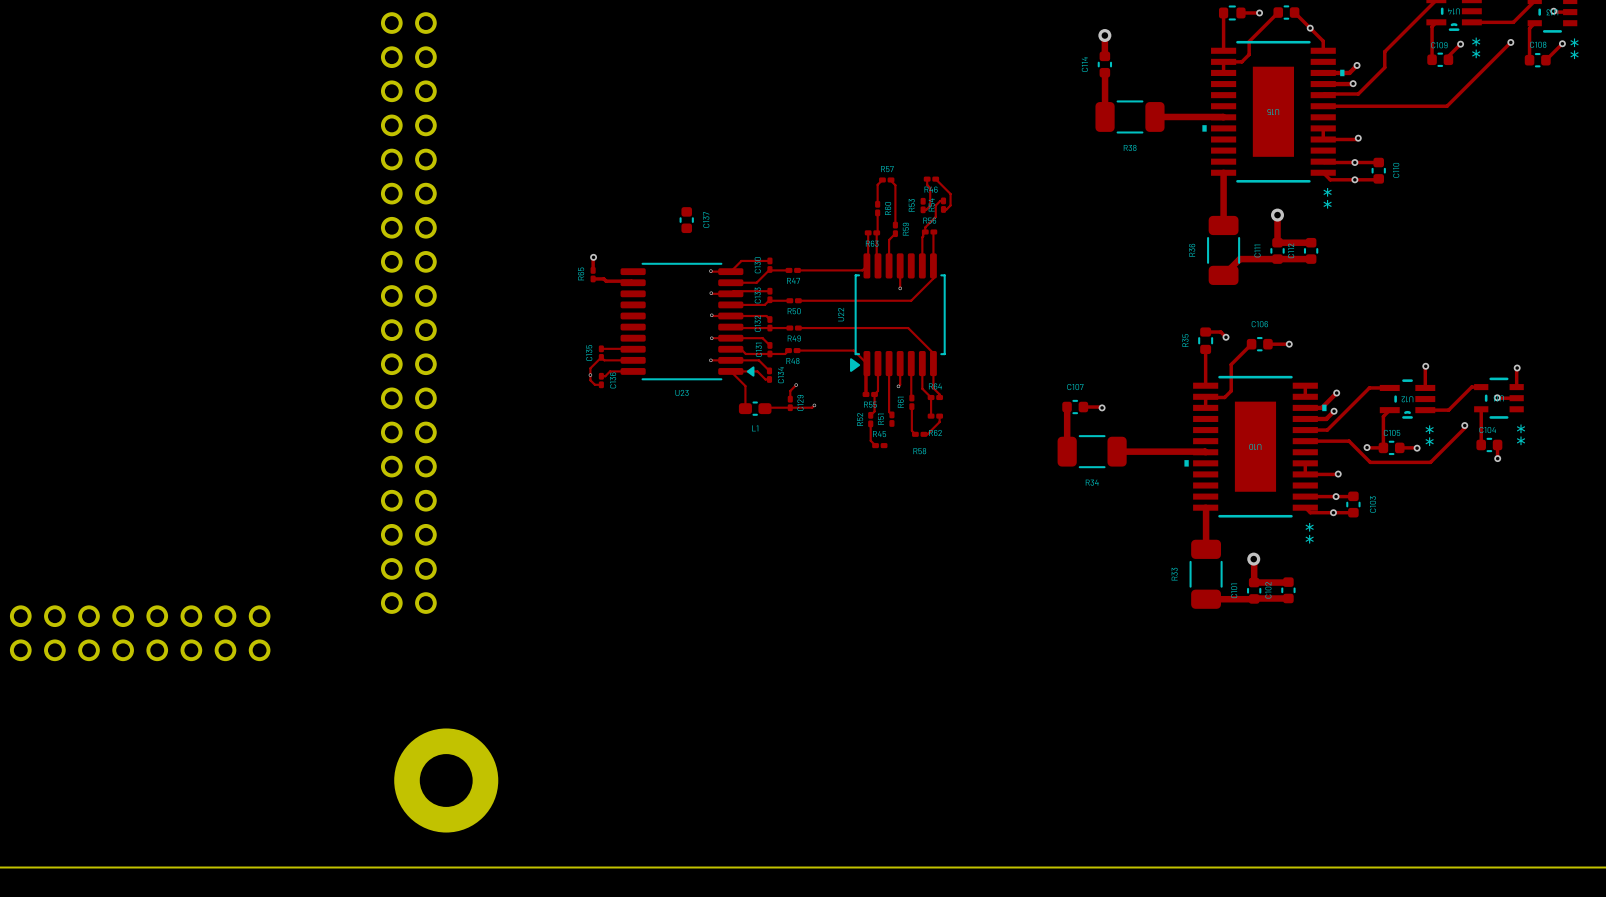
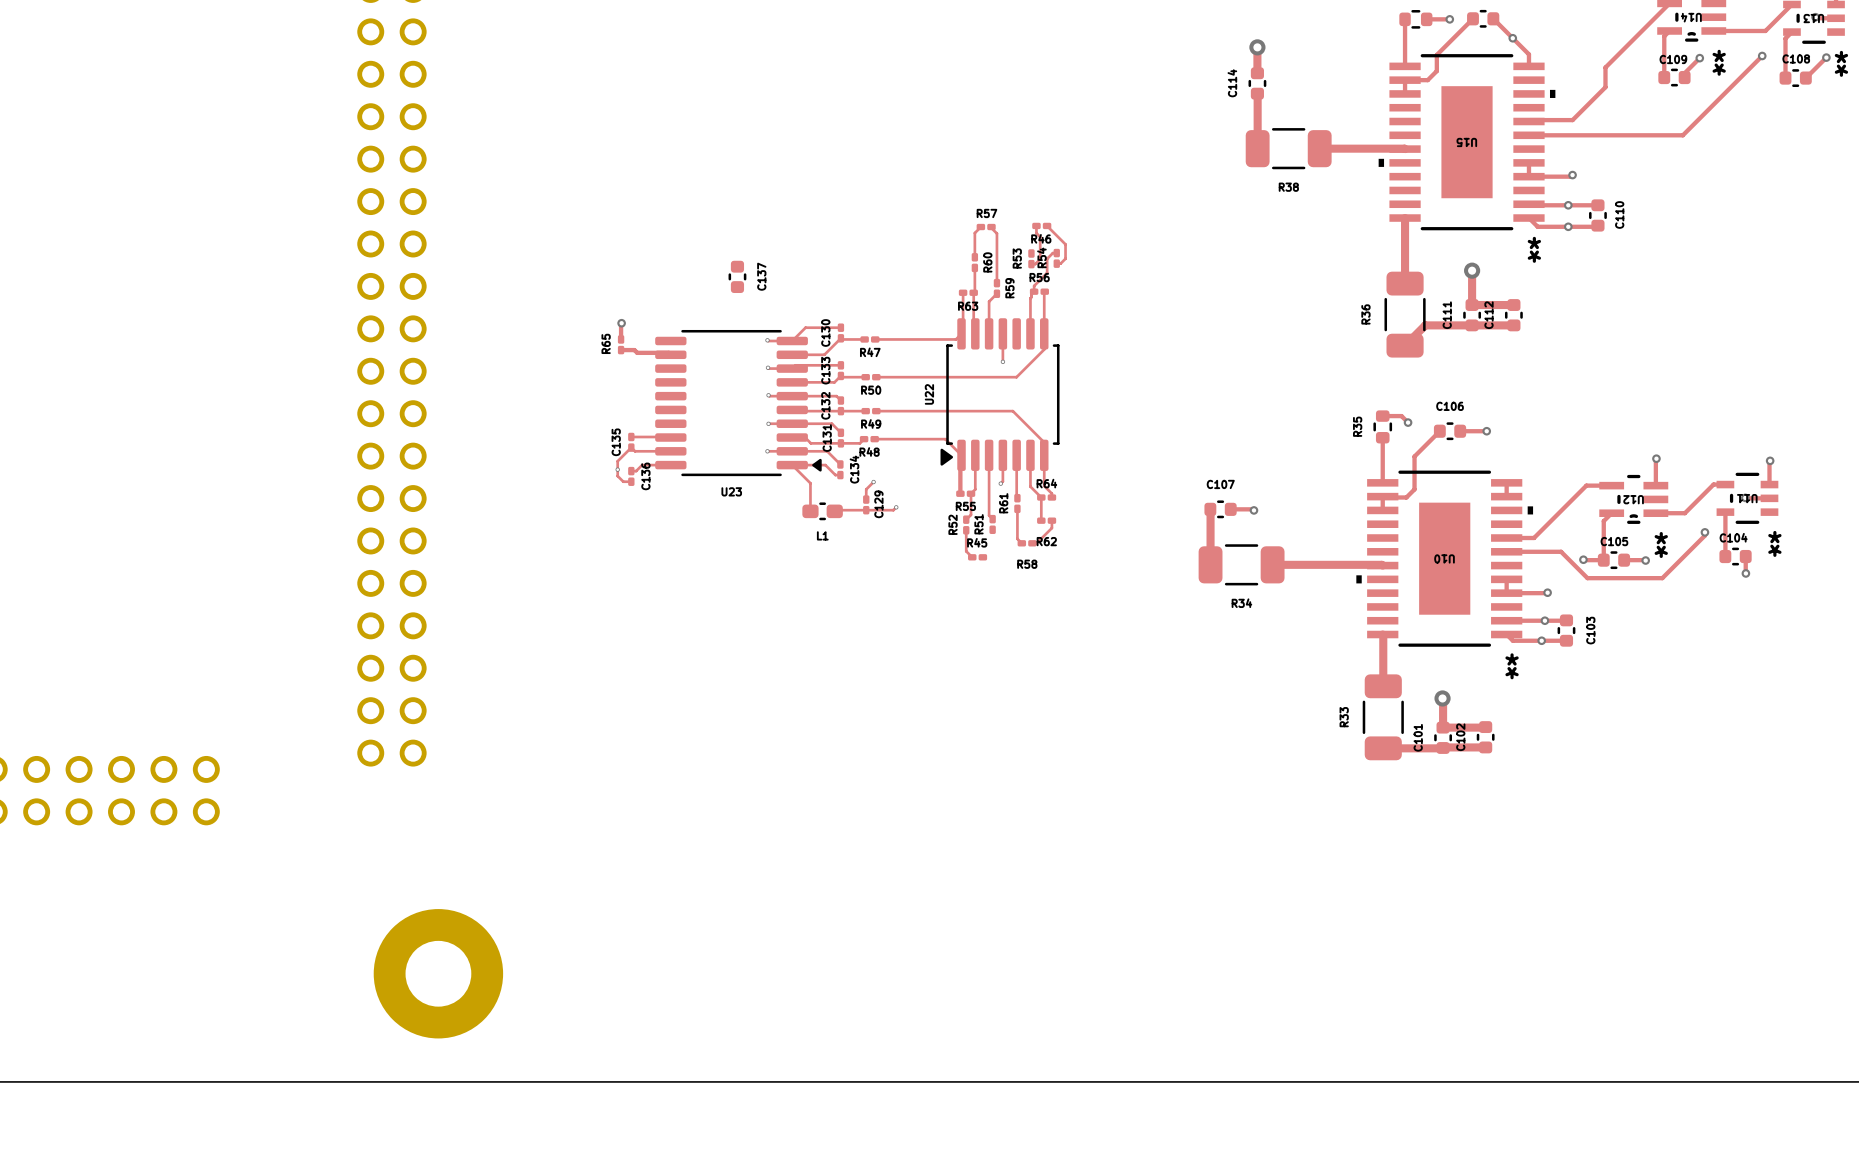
track: (1357, 65) (1349, 72) (1323, 72) -> none
via: (1357, 65) -> none
track: (1353, 83) (1323, 84) -> none
via: (1353, 83) -> none
track: (1336, 393) (1321, 407) (1305, 407) -> none
via: (1336, 393) -> none
track: (1334, 411) (1326, 418) (1305, 418) -> none
via: (1334, 411) -> none

